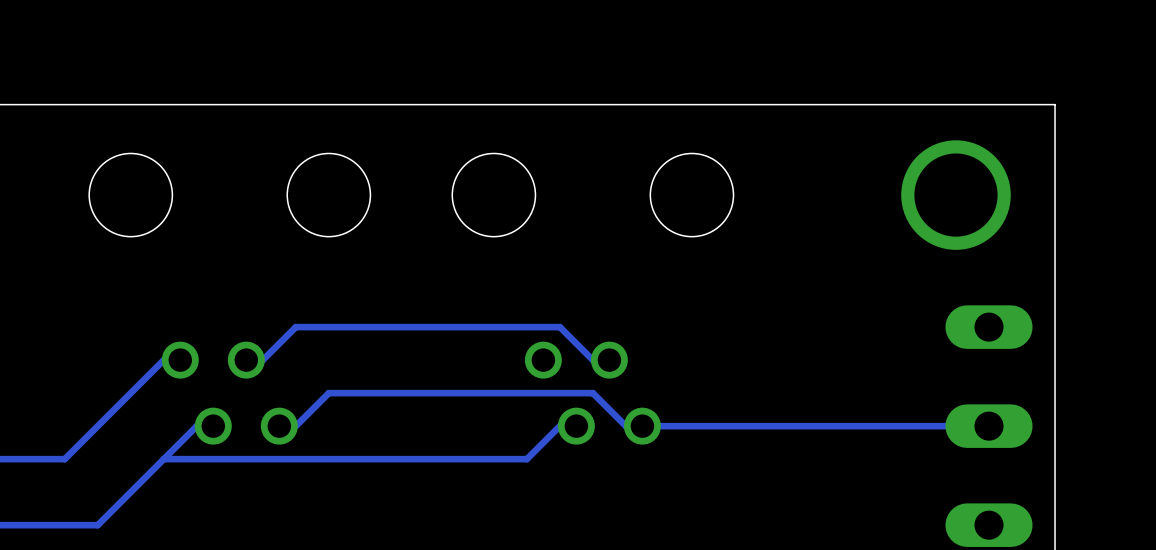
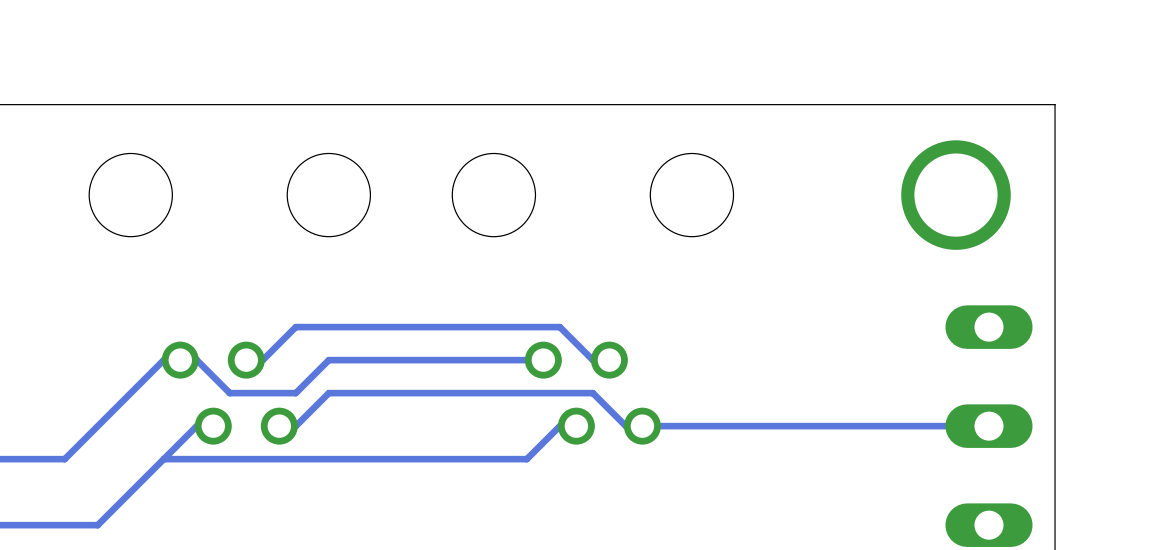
track: none -> (543, 360) (328, 360) (295, 393) (229, 393) (196, 360) (180, 360)

